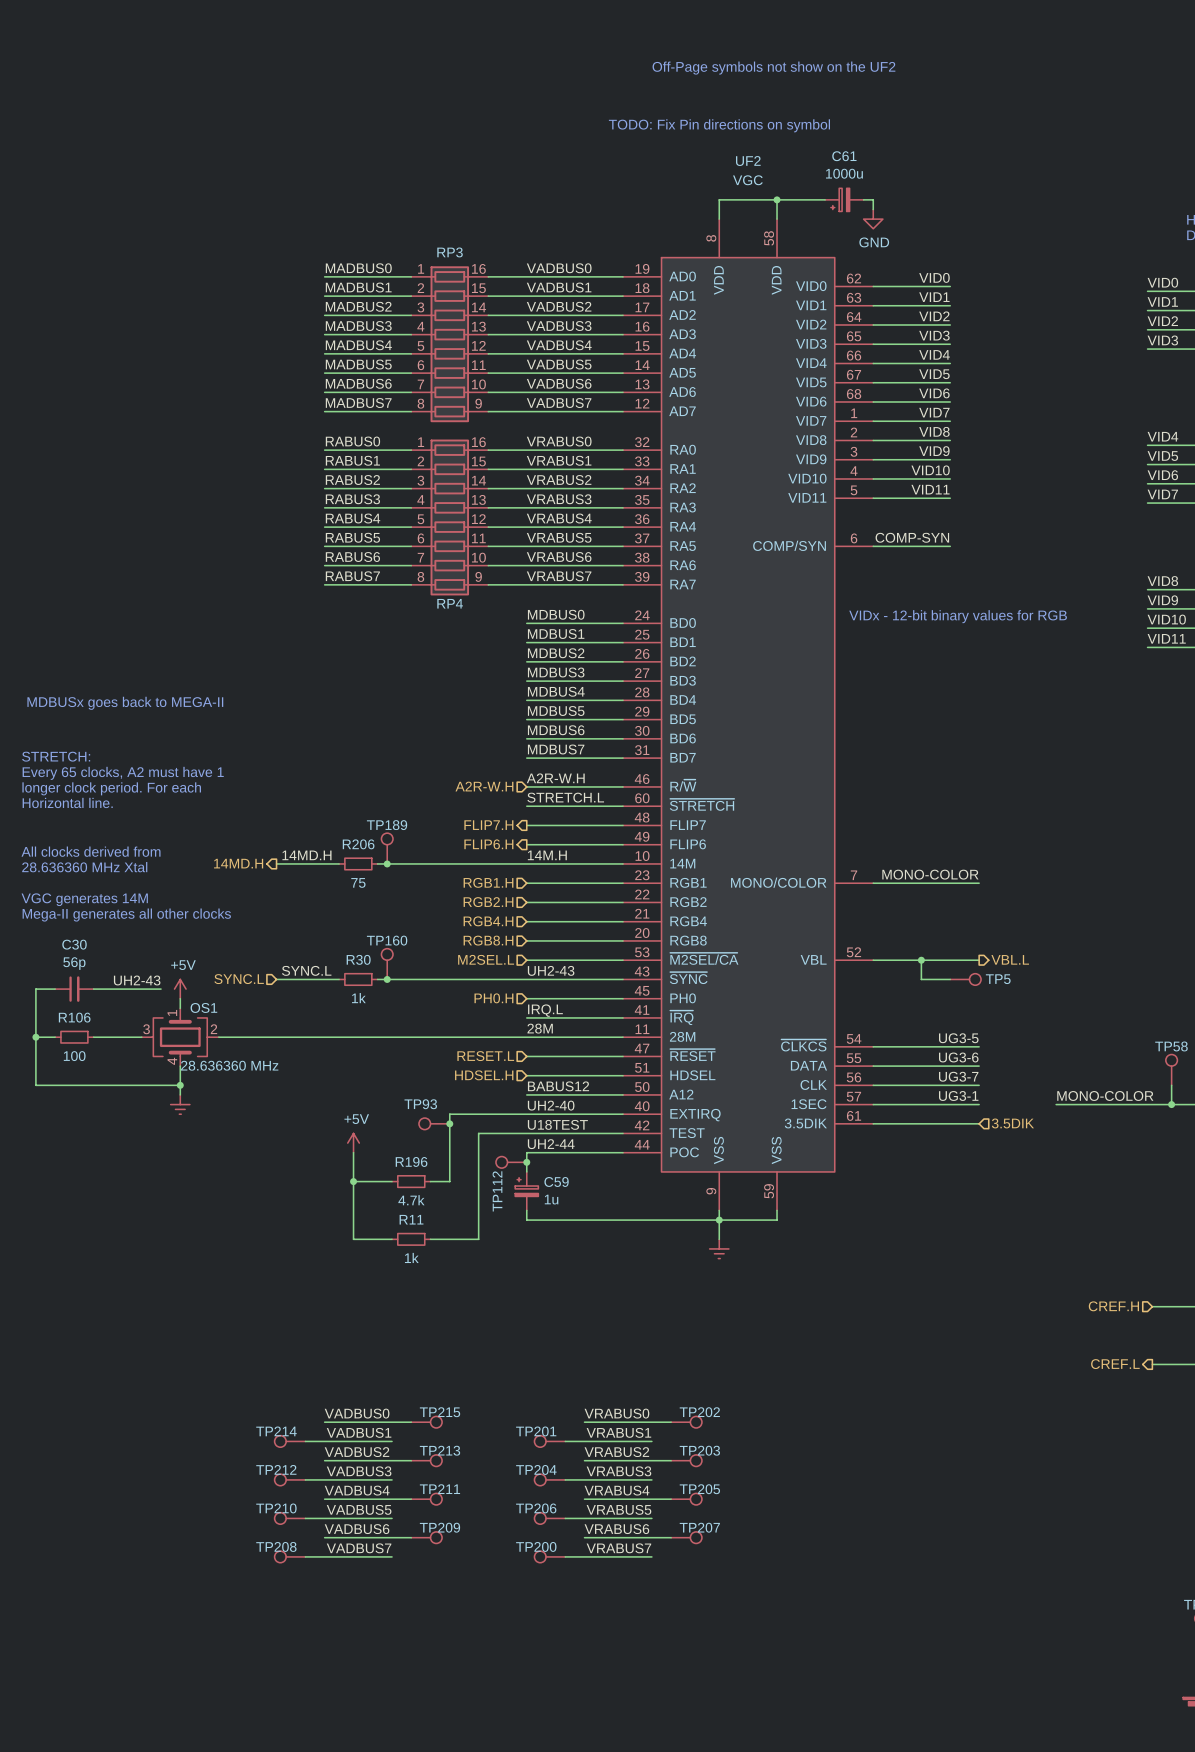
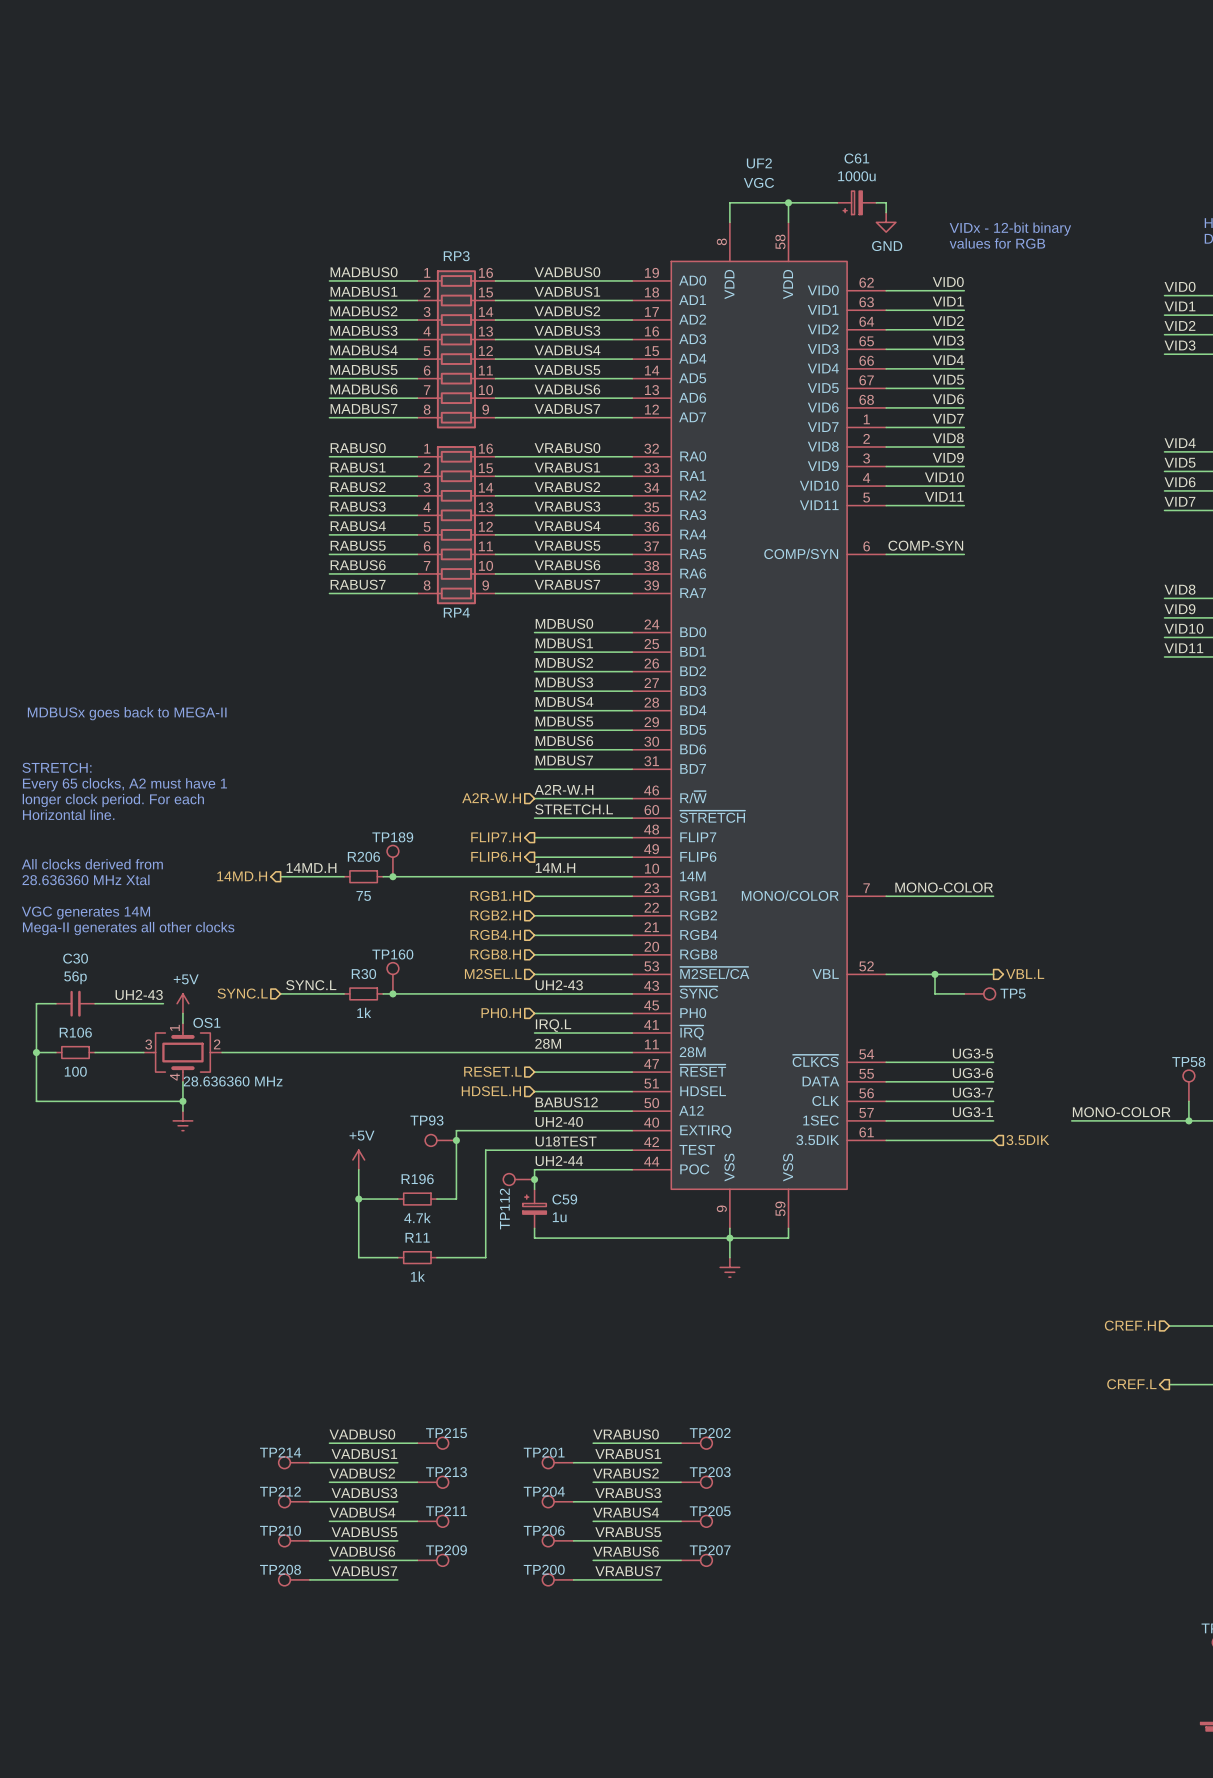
text: Off-Page symbols not show on the UF2 (773, 68) -> none
text: TODO: Fix Pin directions on symbol (719, 125) -> none
text: none -> VIDx - 12-bit binary (1010, 229)
text: none -> values for RGB (997, 243)
text: VIDx - 12-bit binary values for RGB (958, 616) -> none

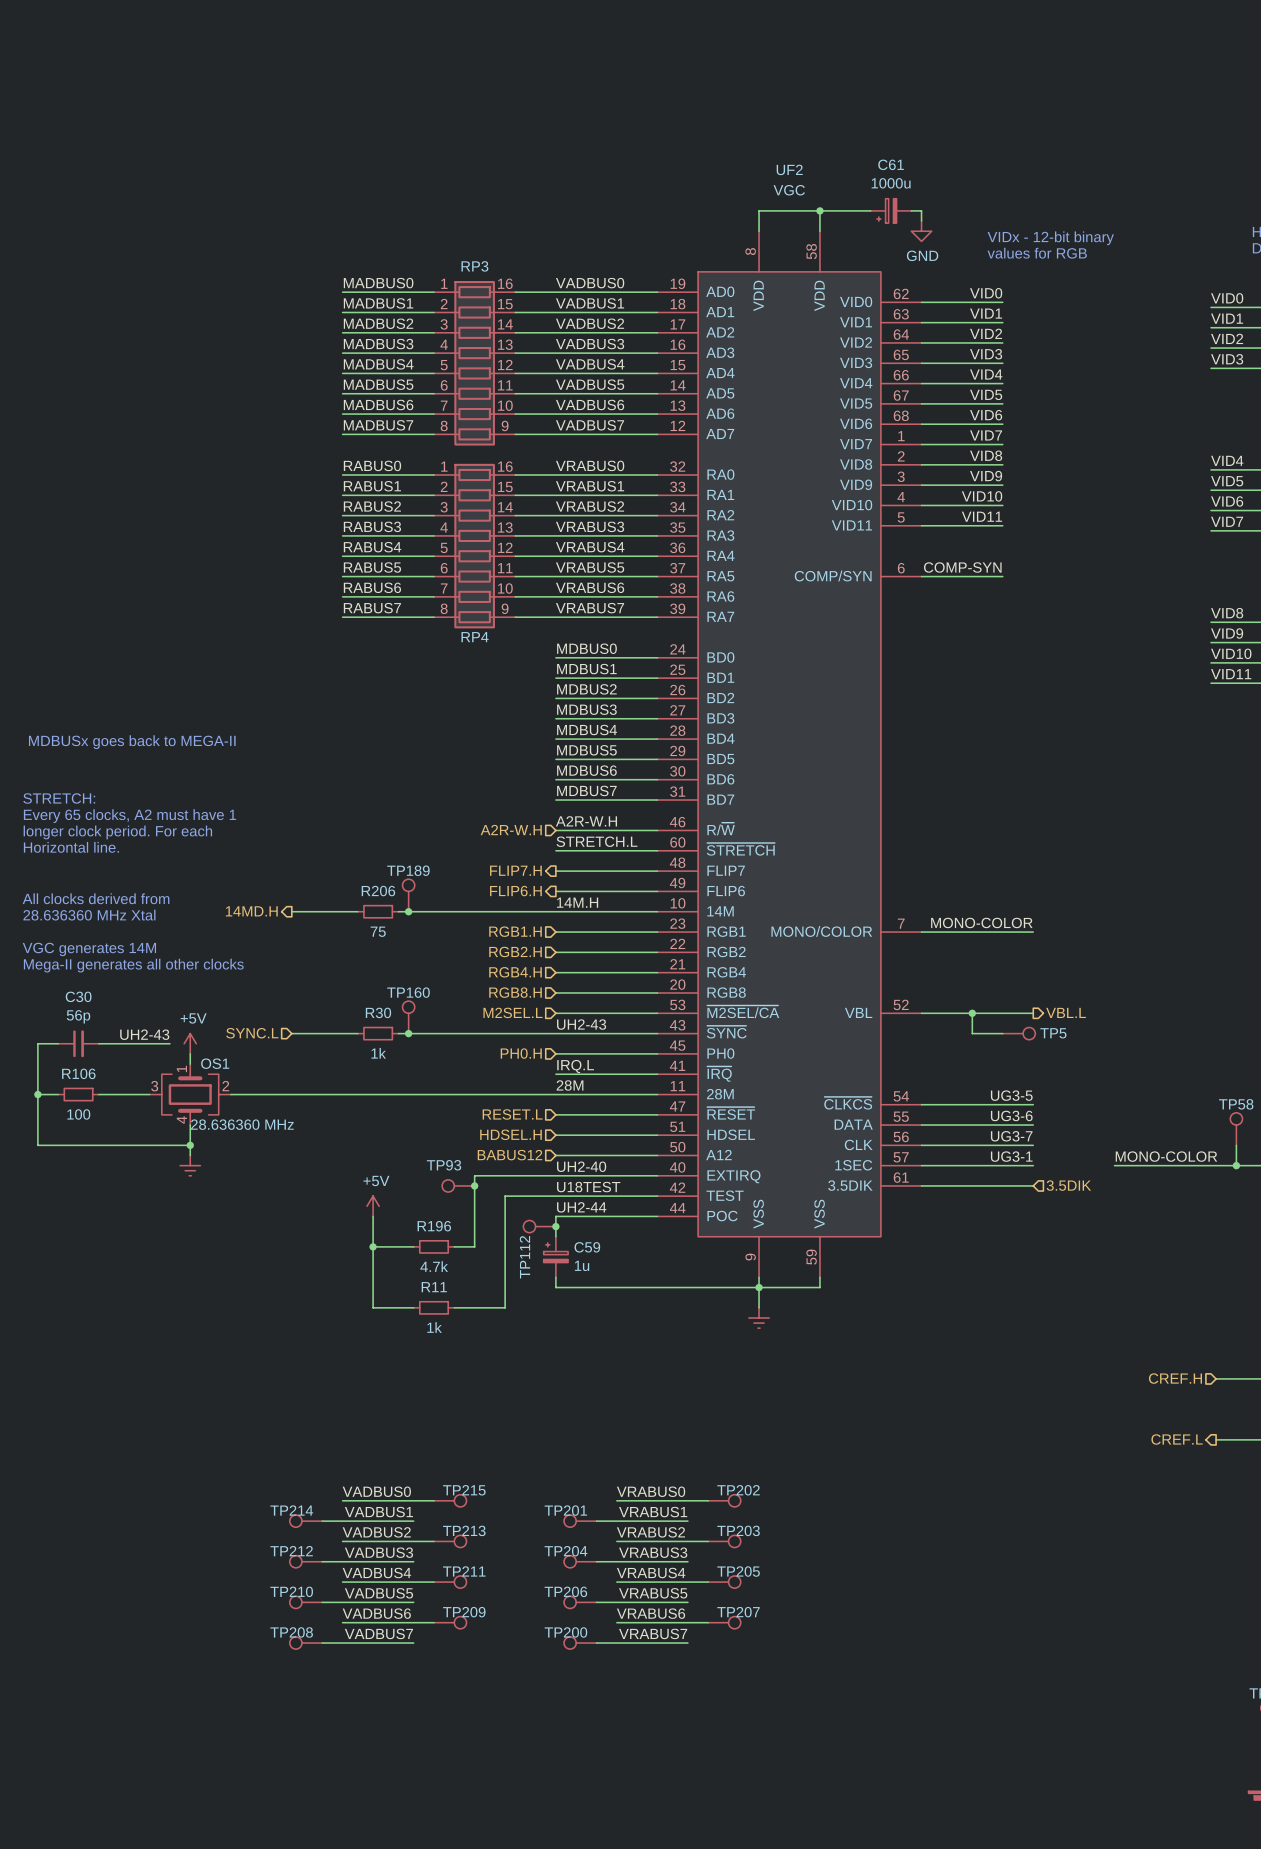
label: 14MD.H (311, 868) -> none
label: SYNC.L (311, 985) -> none
label: BABUS12 (566, 1102) -> none
hierarchical label: none -> BABUS12 (510, 1155)

